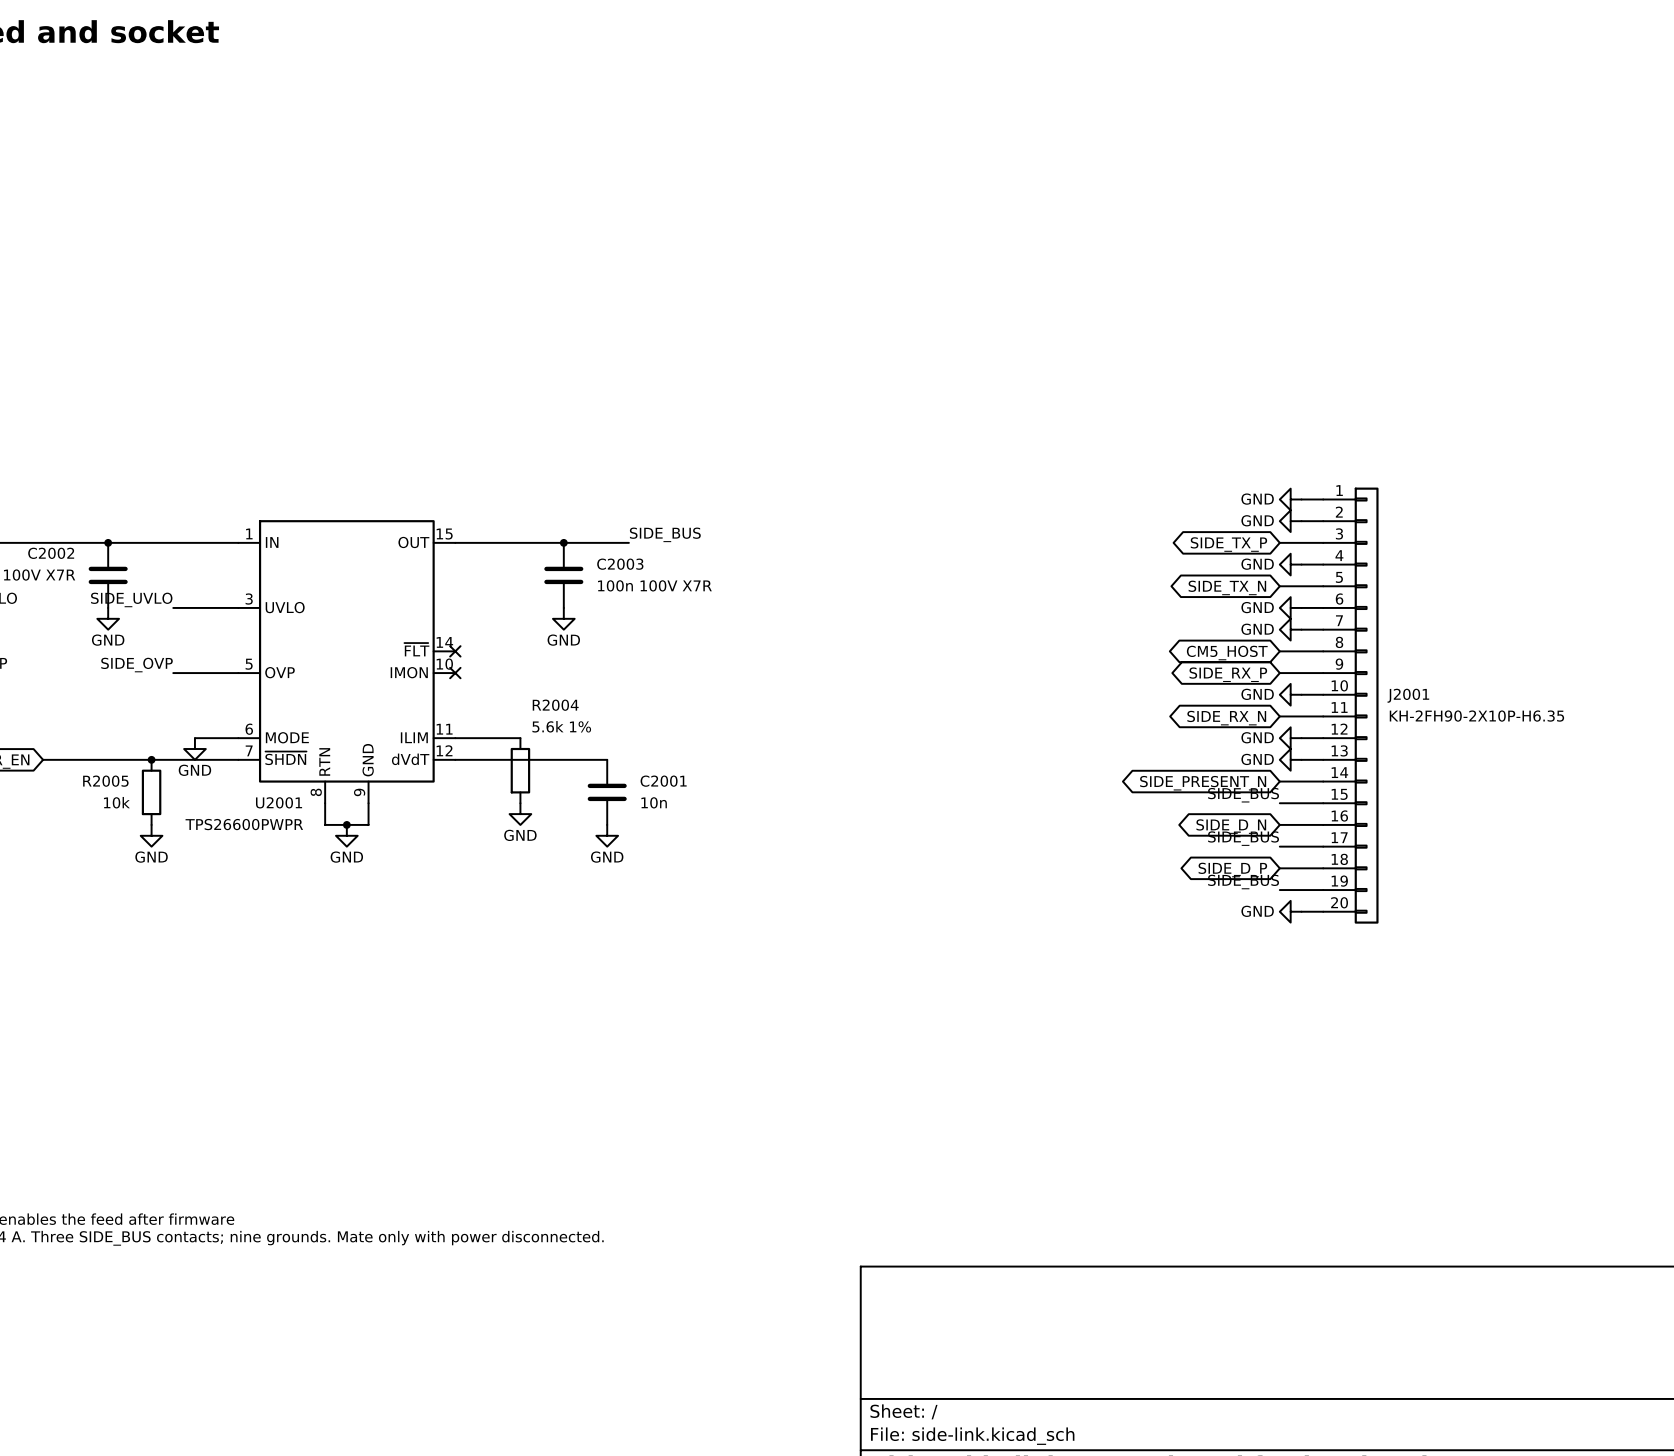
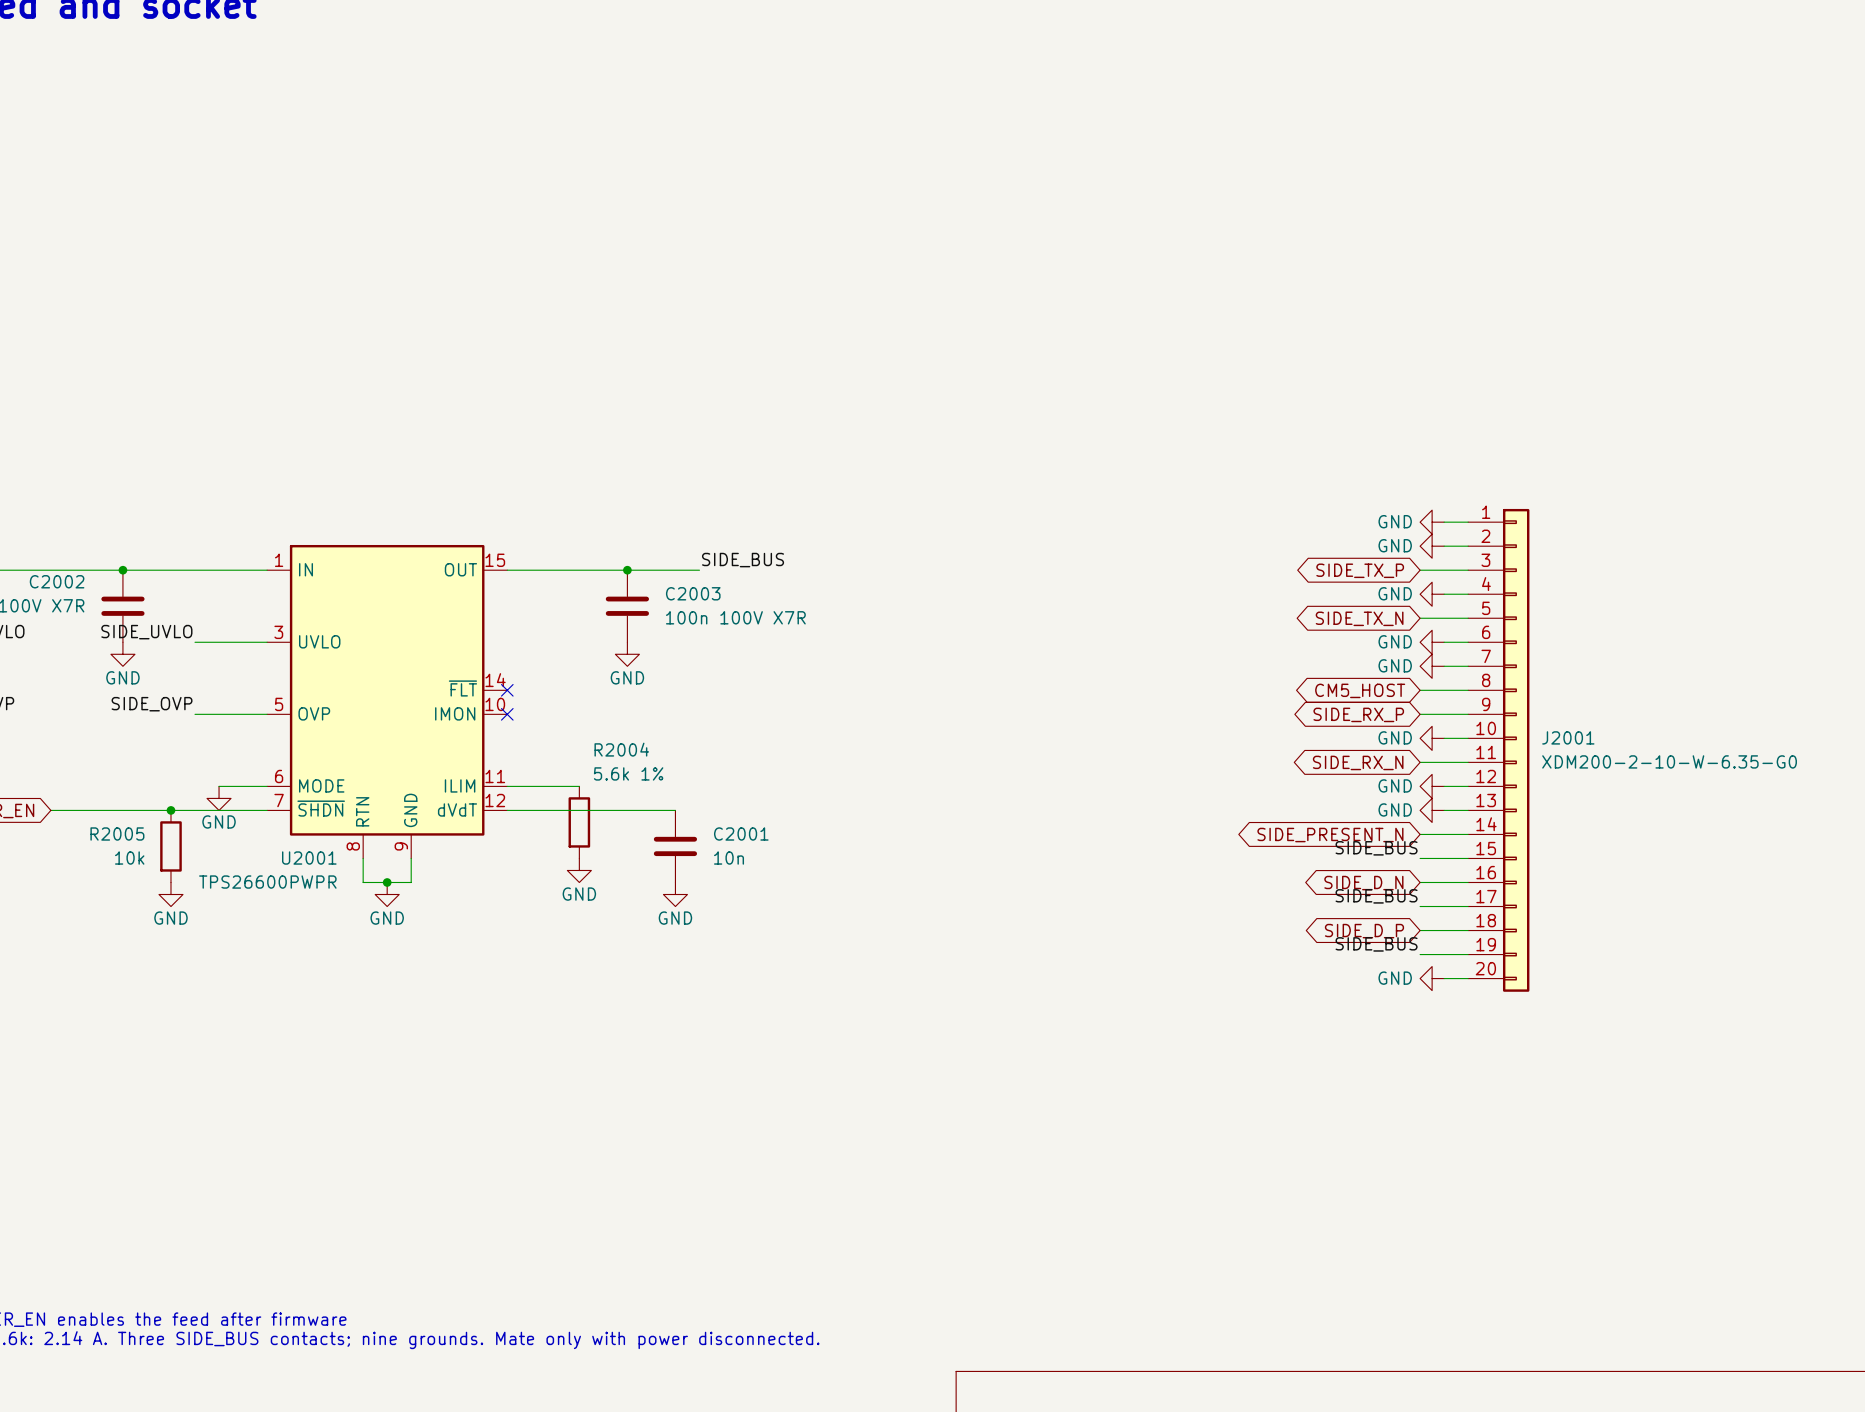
J2001 value: KH-2FH90-2X10P-H6.35 (1476, 716) -> XDM200-2-10-W-6.35-G0 (1669, 761)

